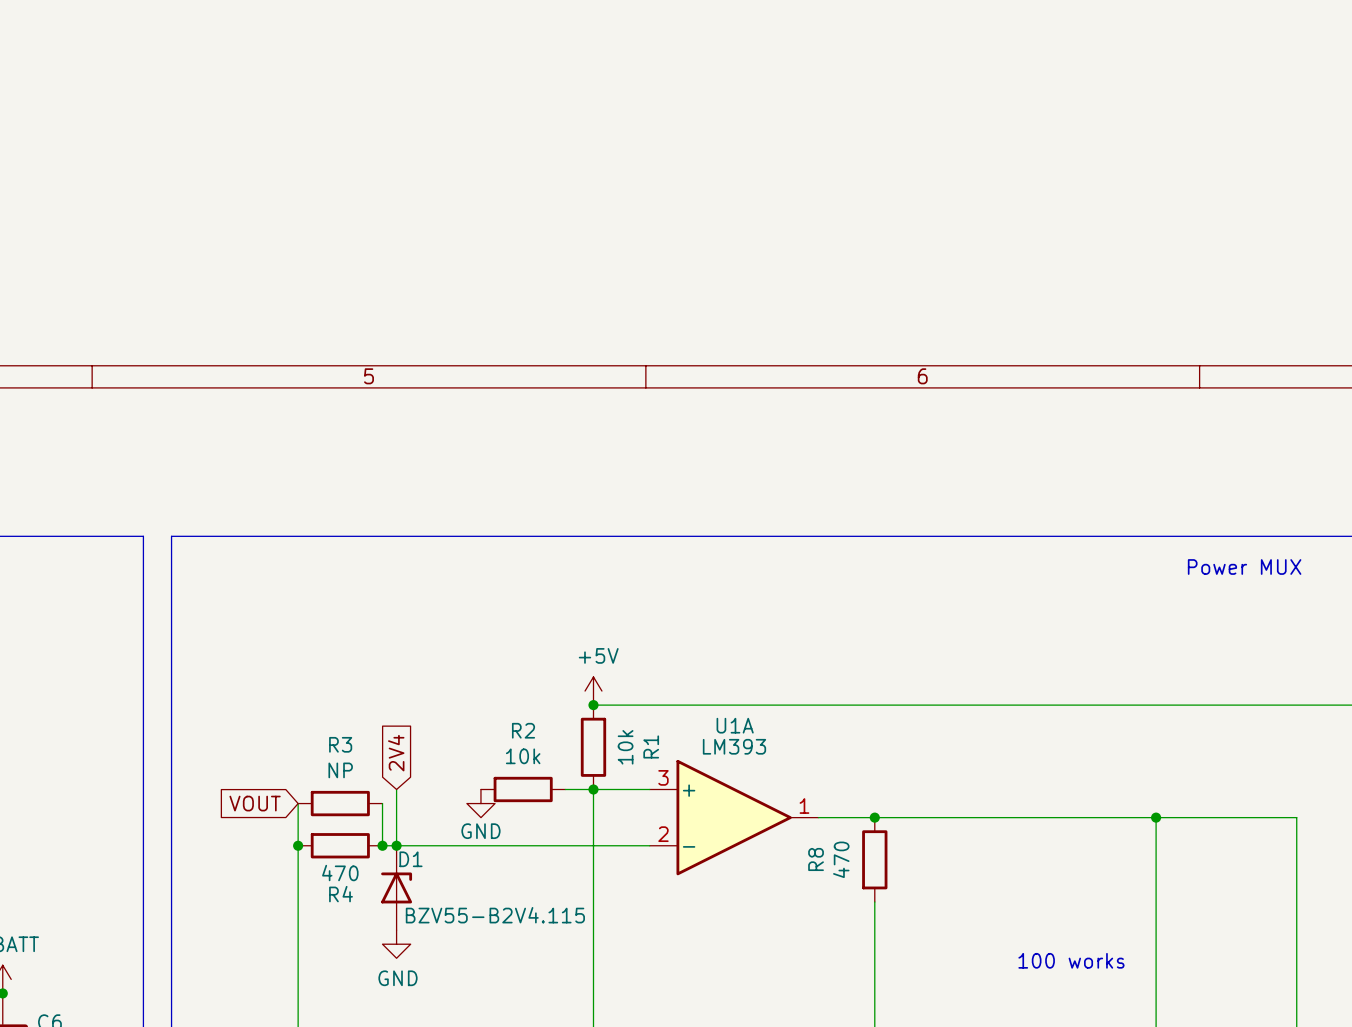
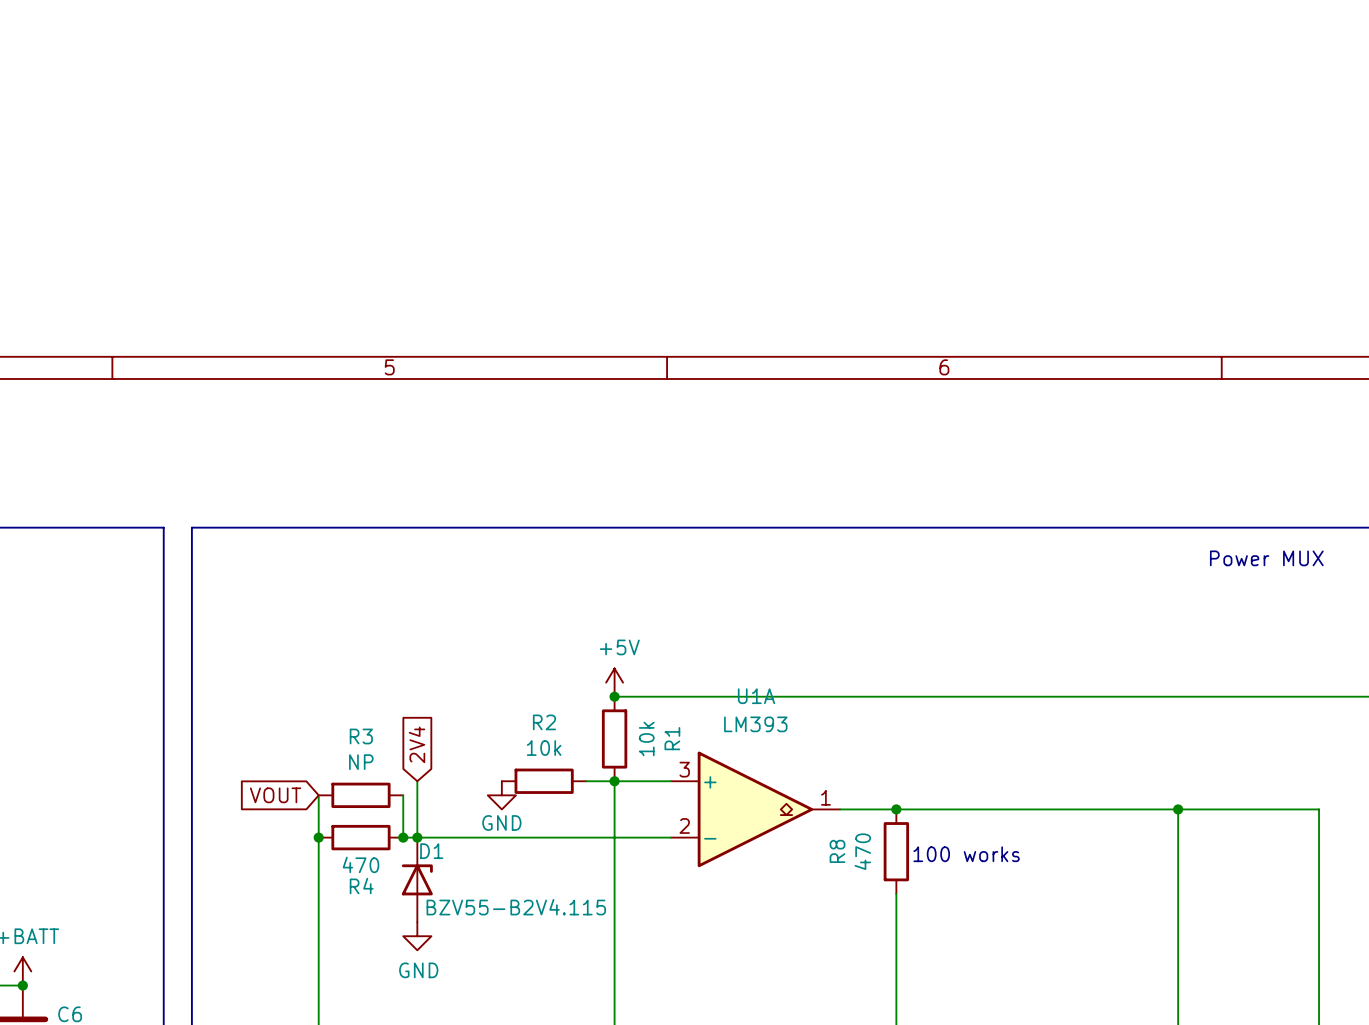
U1A symbol: [649, 759, 819, 876] -> [670, 751, 841, 868]
text position: 100 works (1071, 960) -> 100 works (966, 854)

